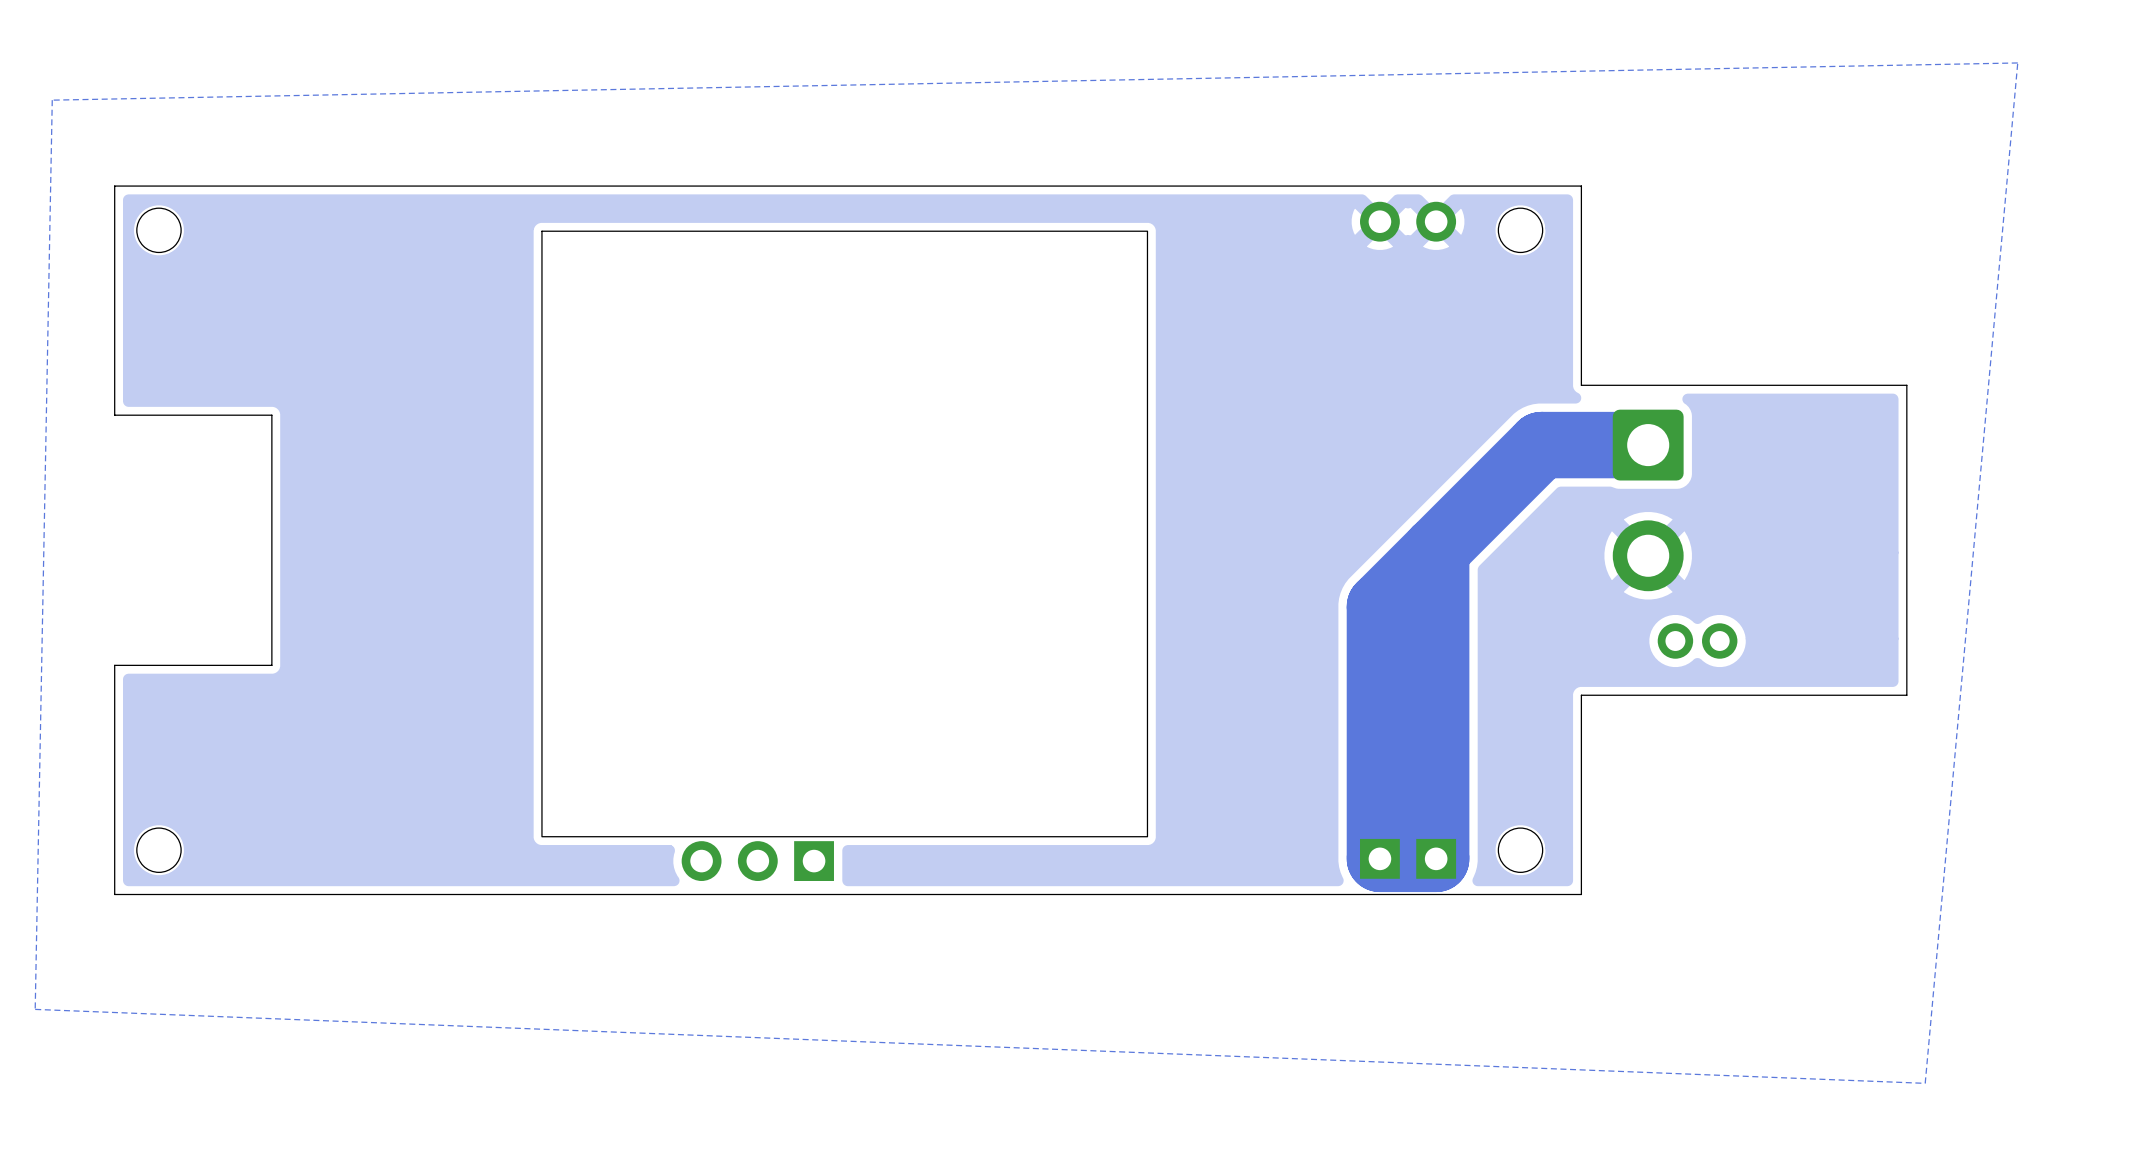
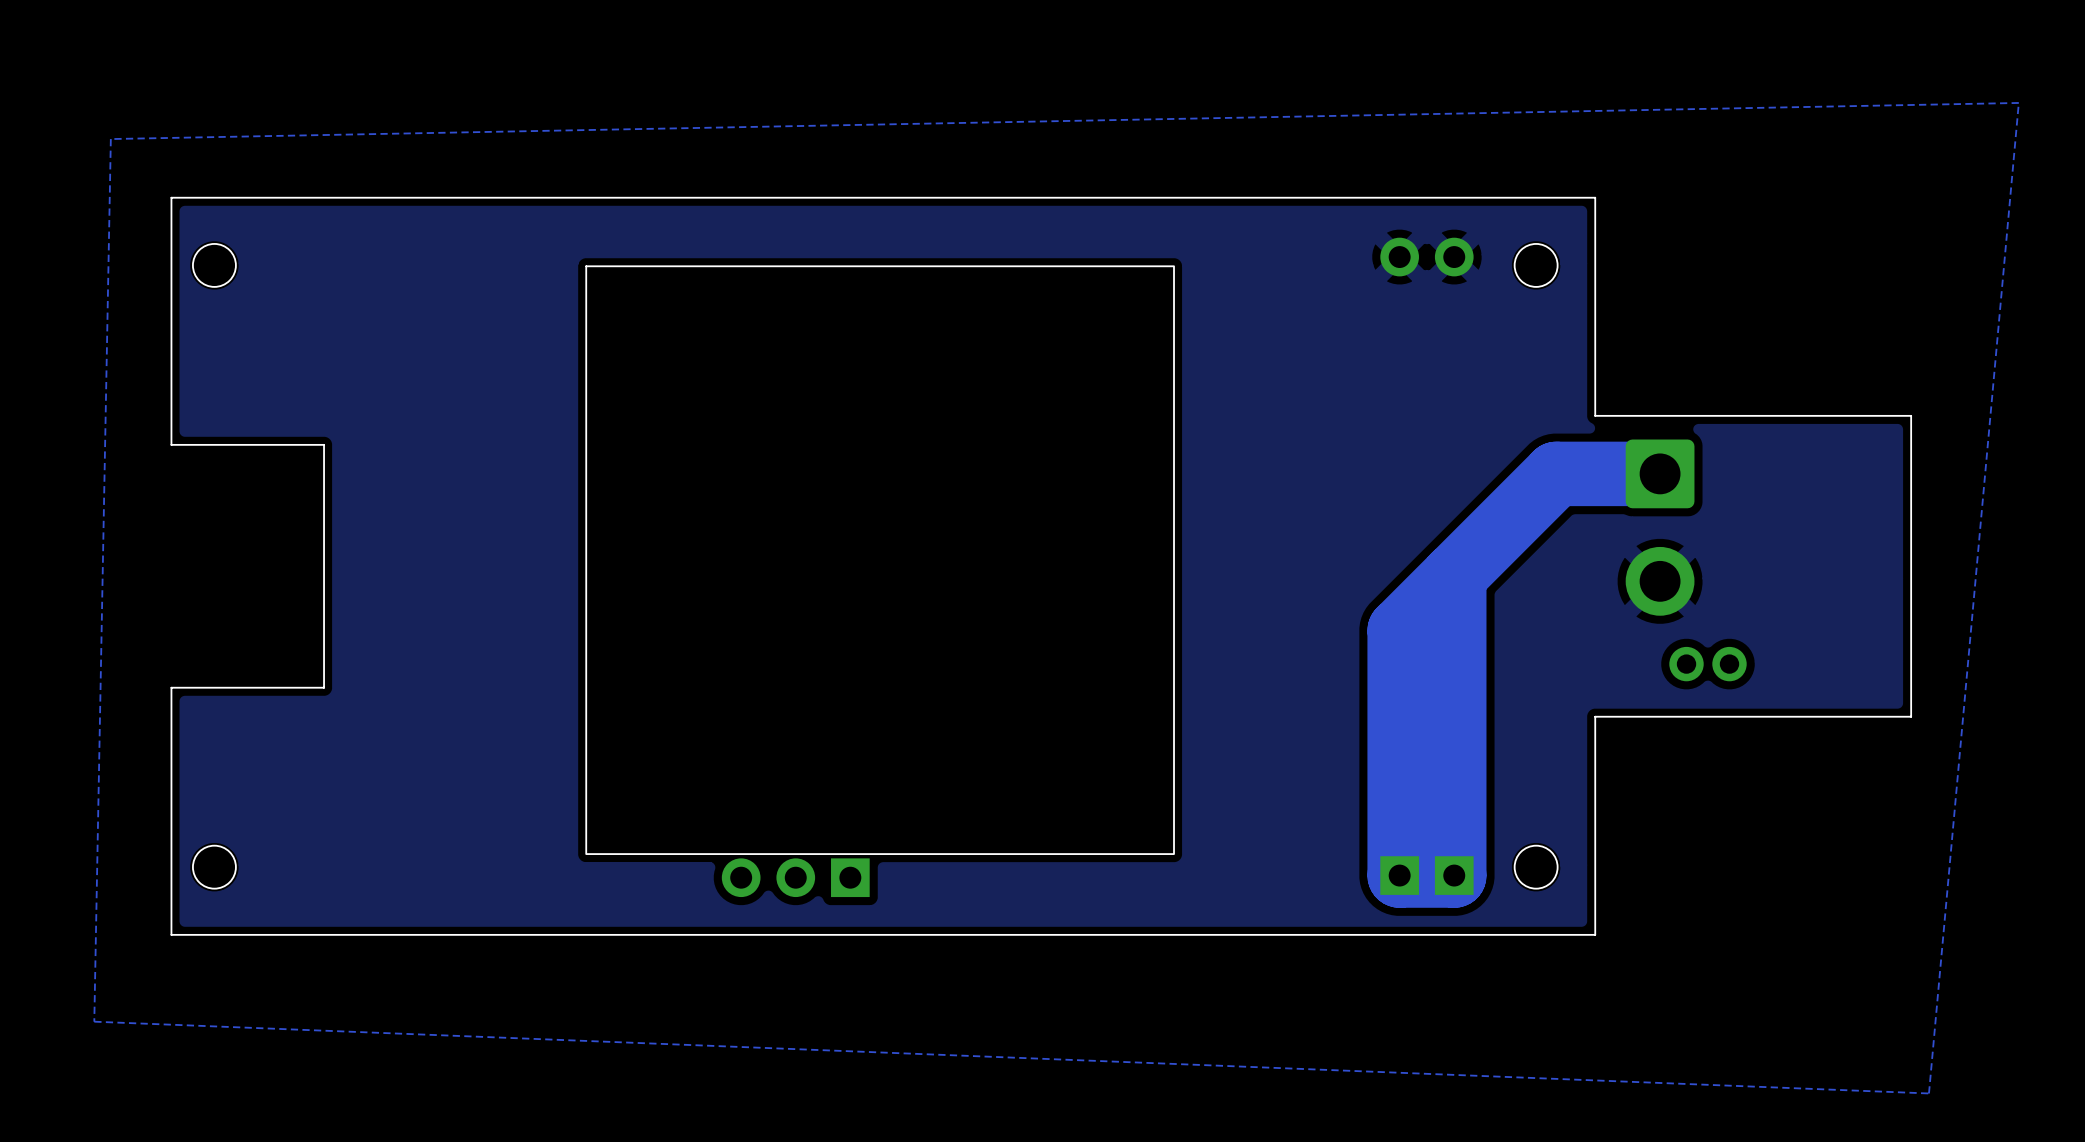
board edge: (1581, 186) (114, 186) -> (1595, 222) (1595, 197) (171, 197) (171, 222)
board edge: (1581, 894) (114, 894) -> (1595, 910) (1595, 934) (171, 934) (171, 910)

